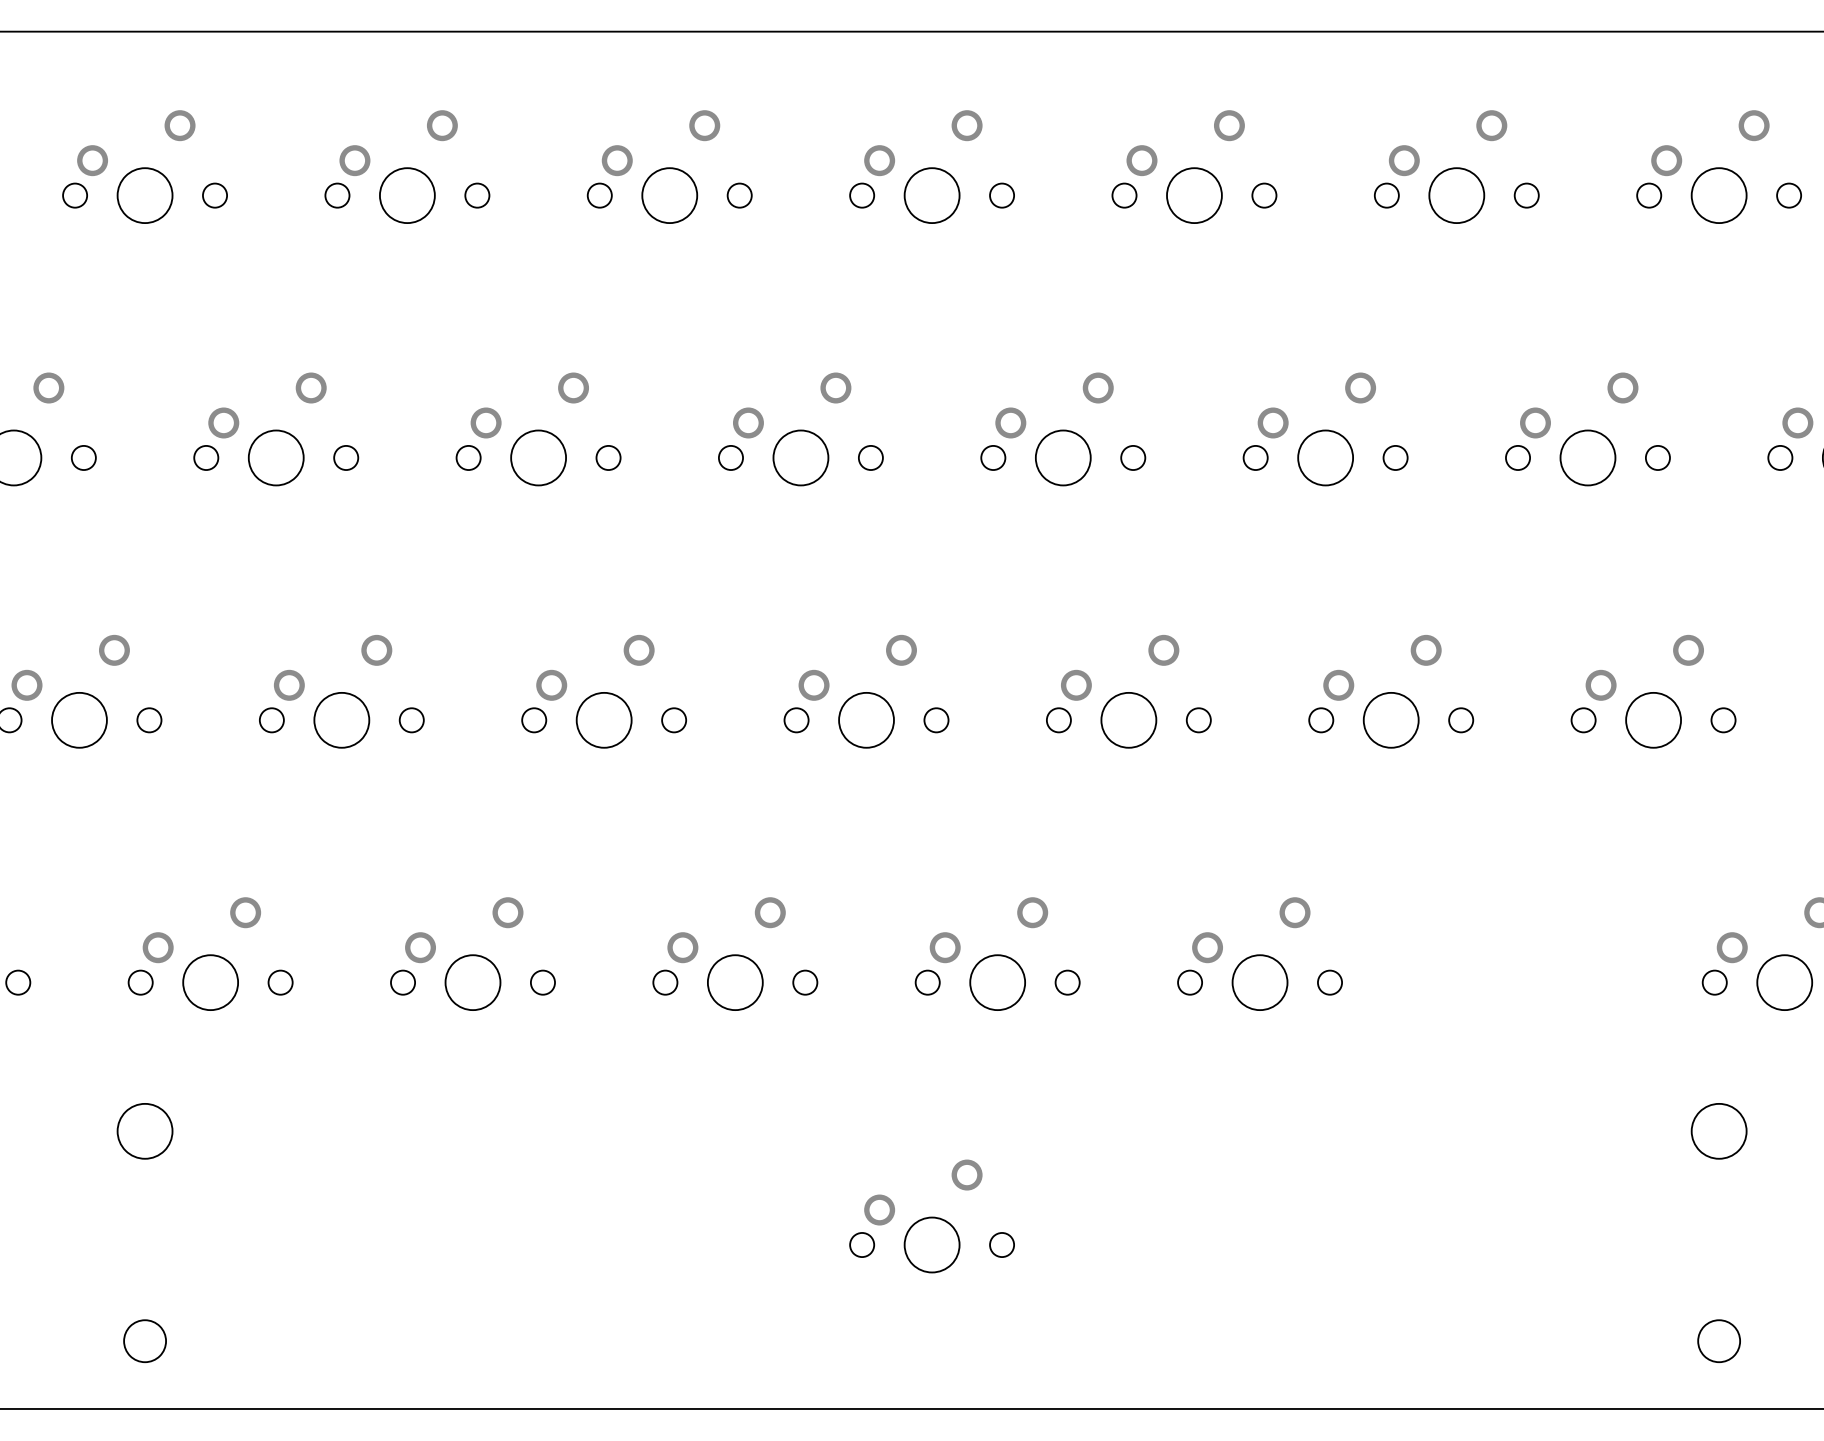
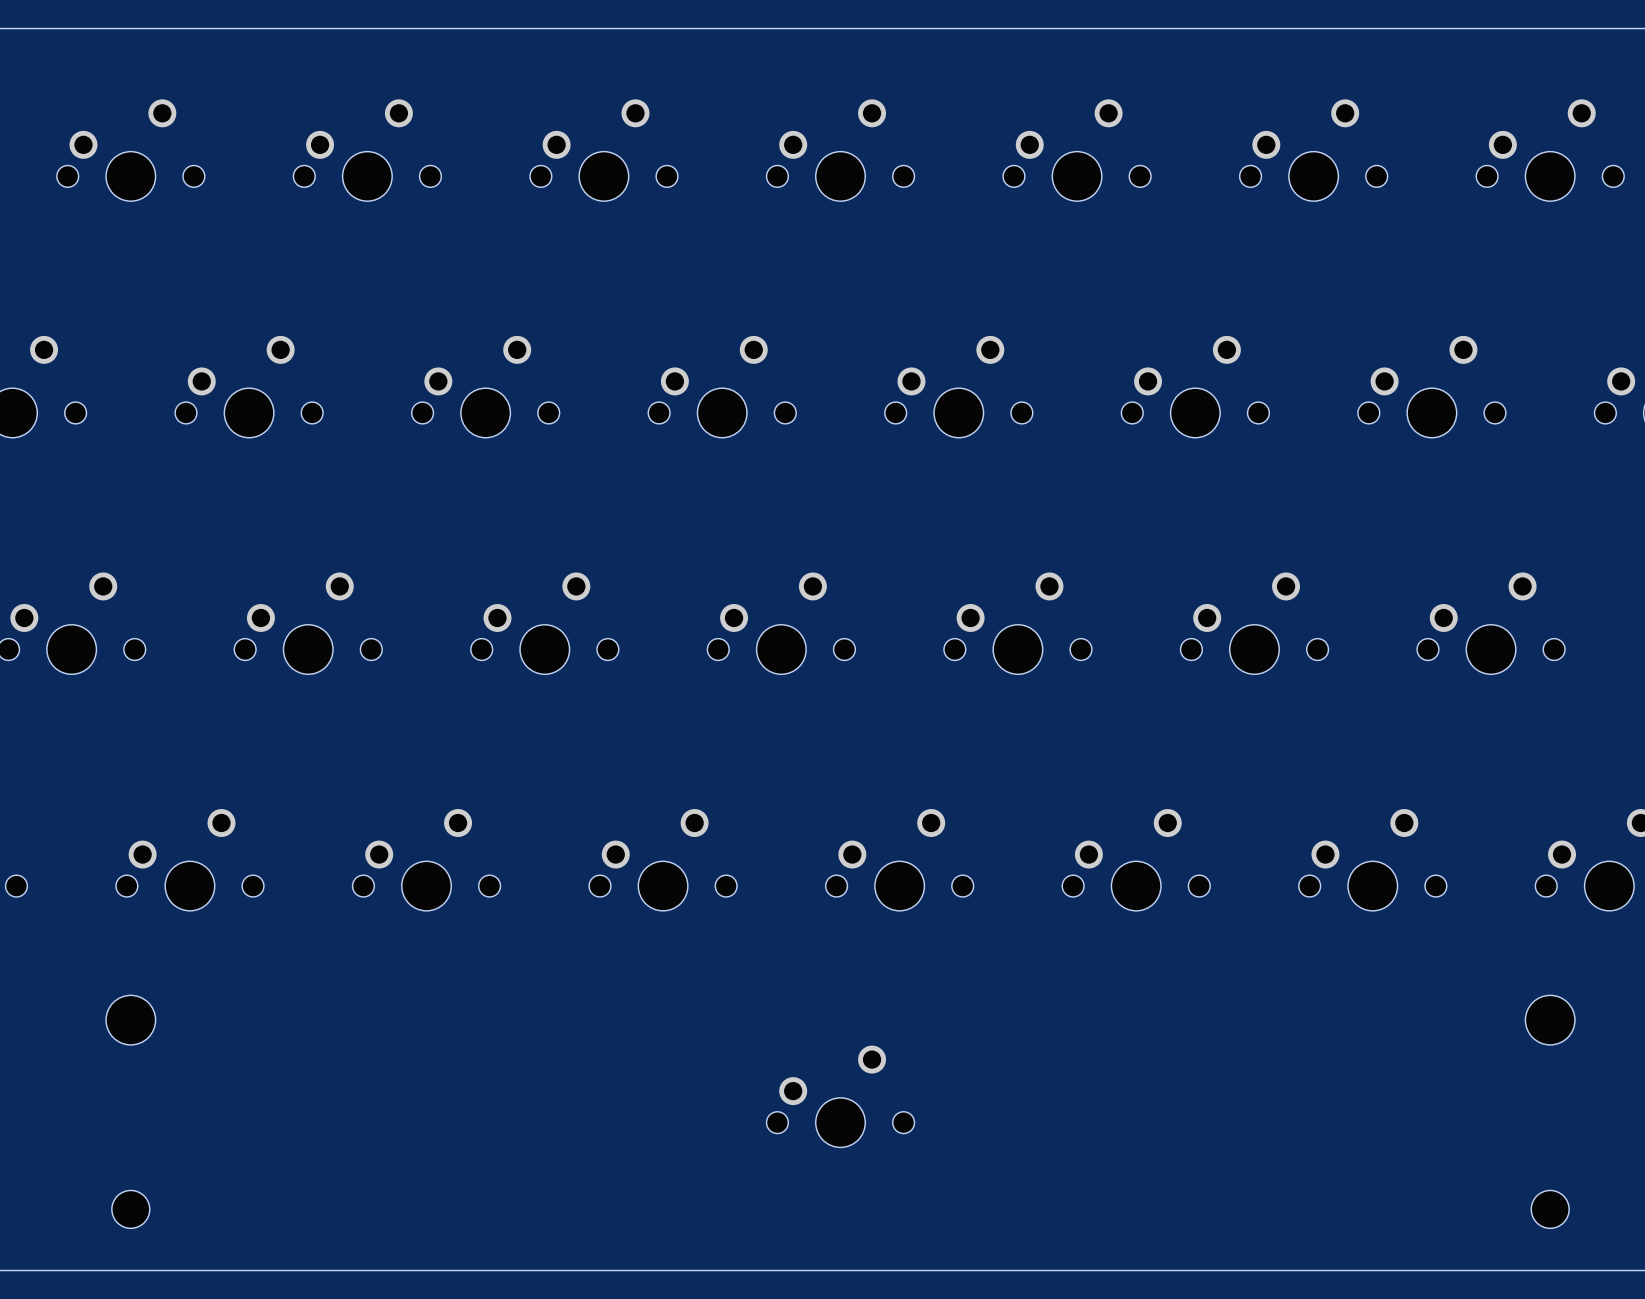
part: none -> (1372, 859)

